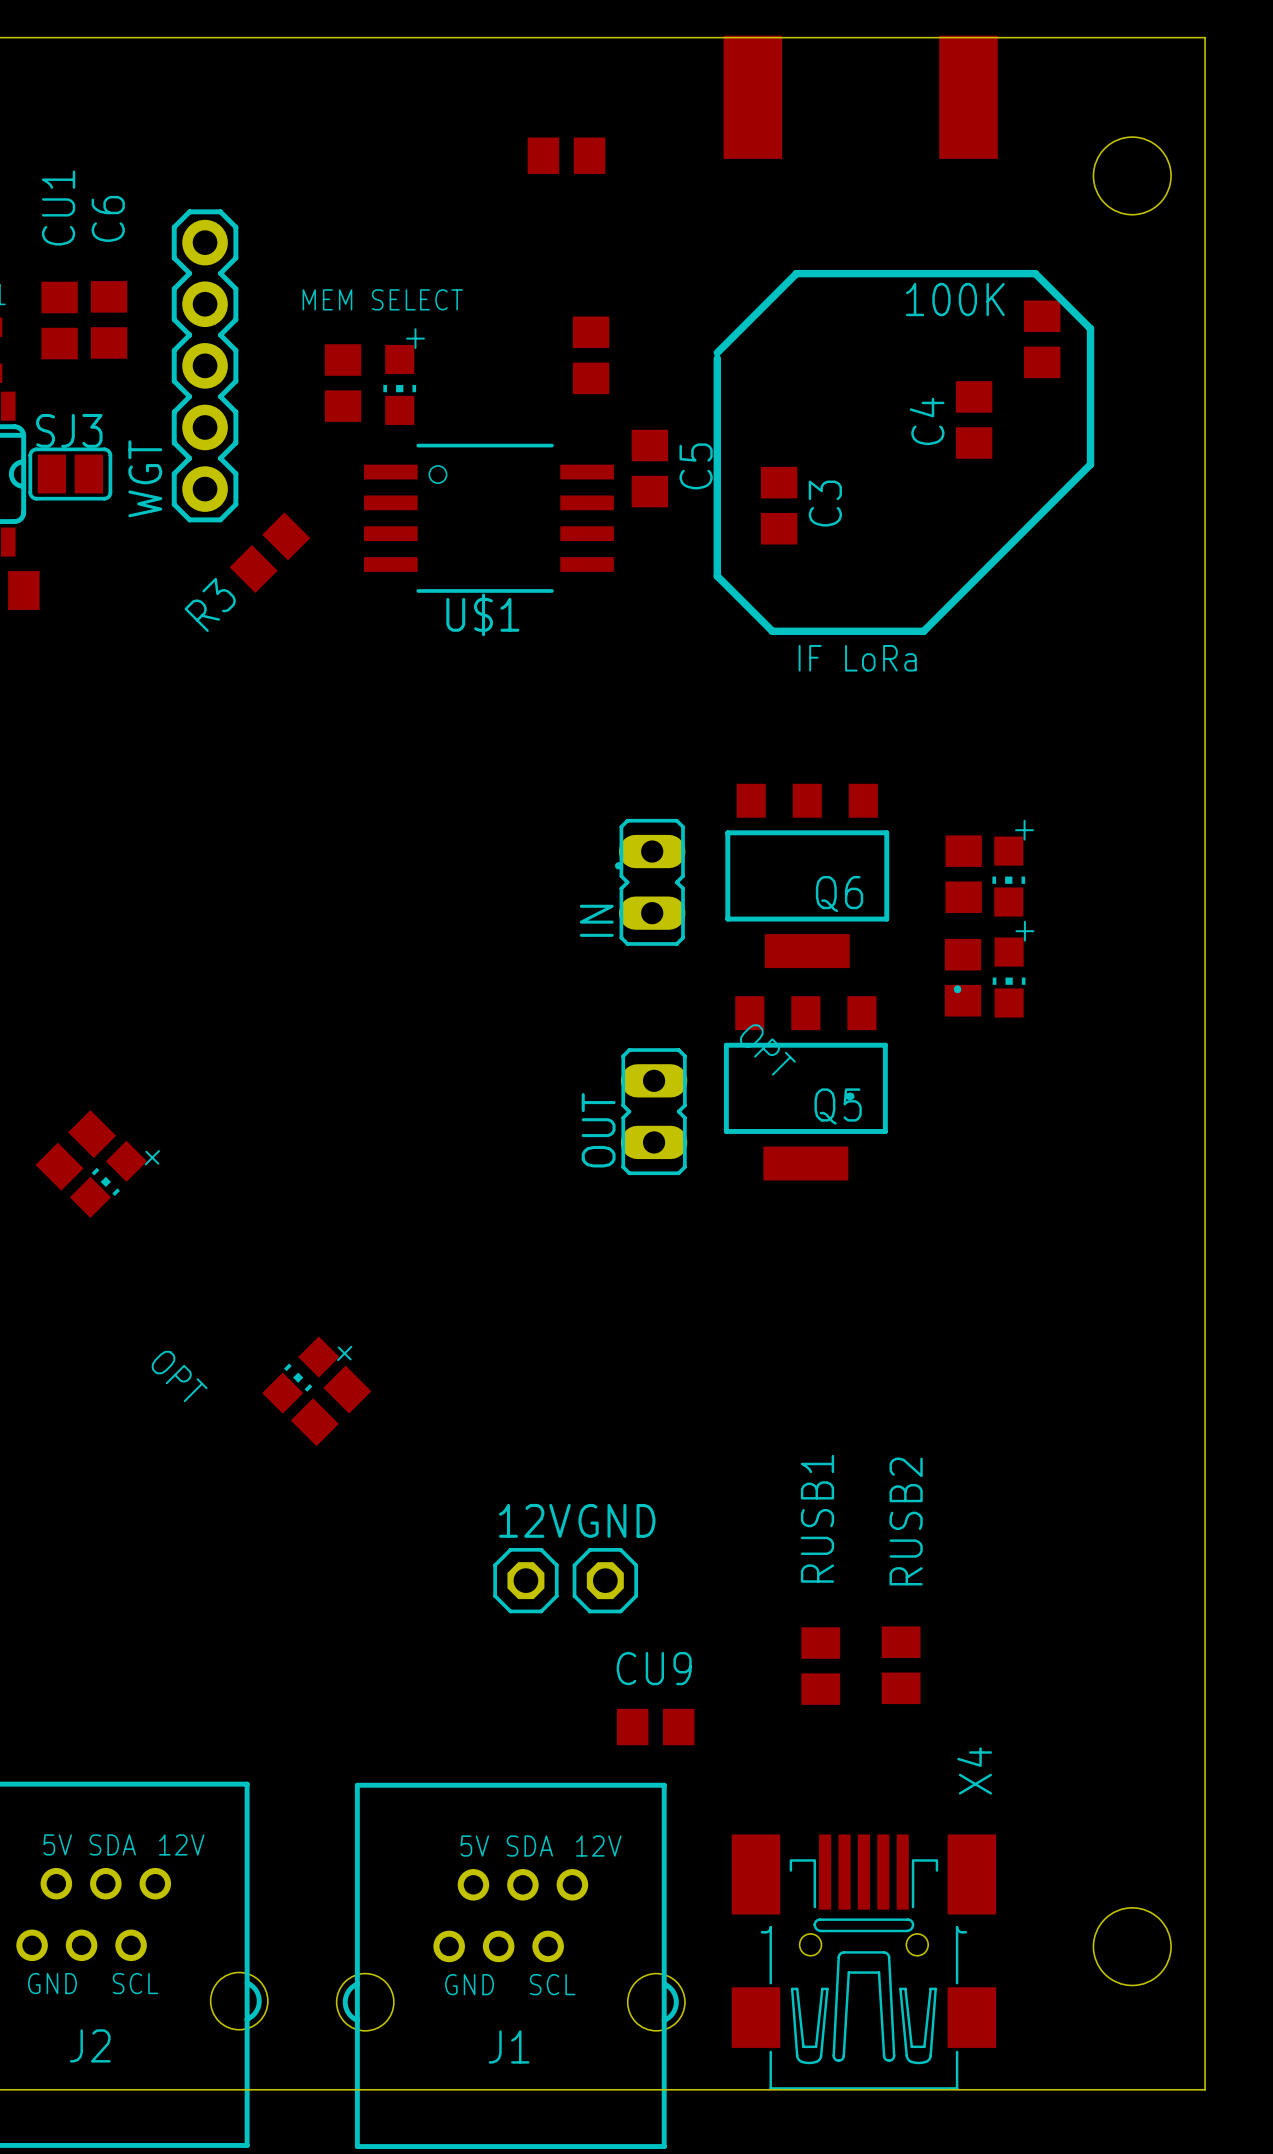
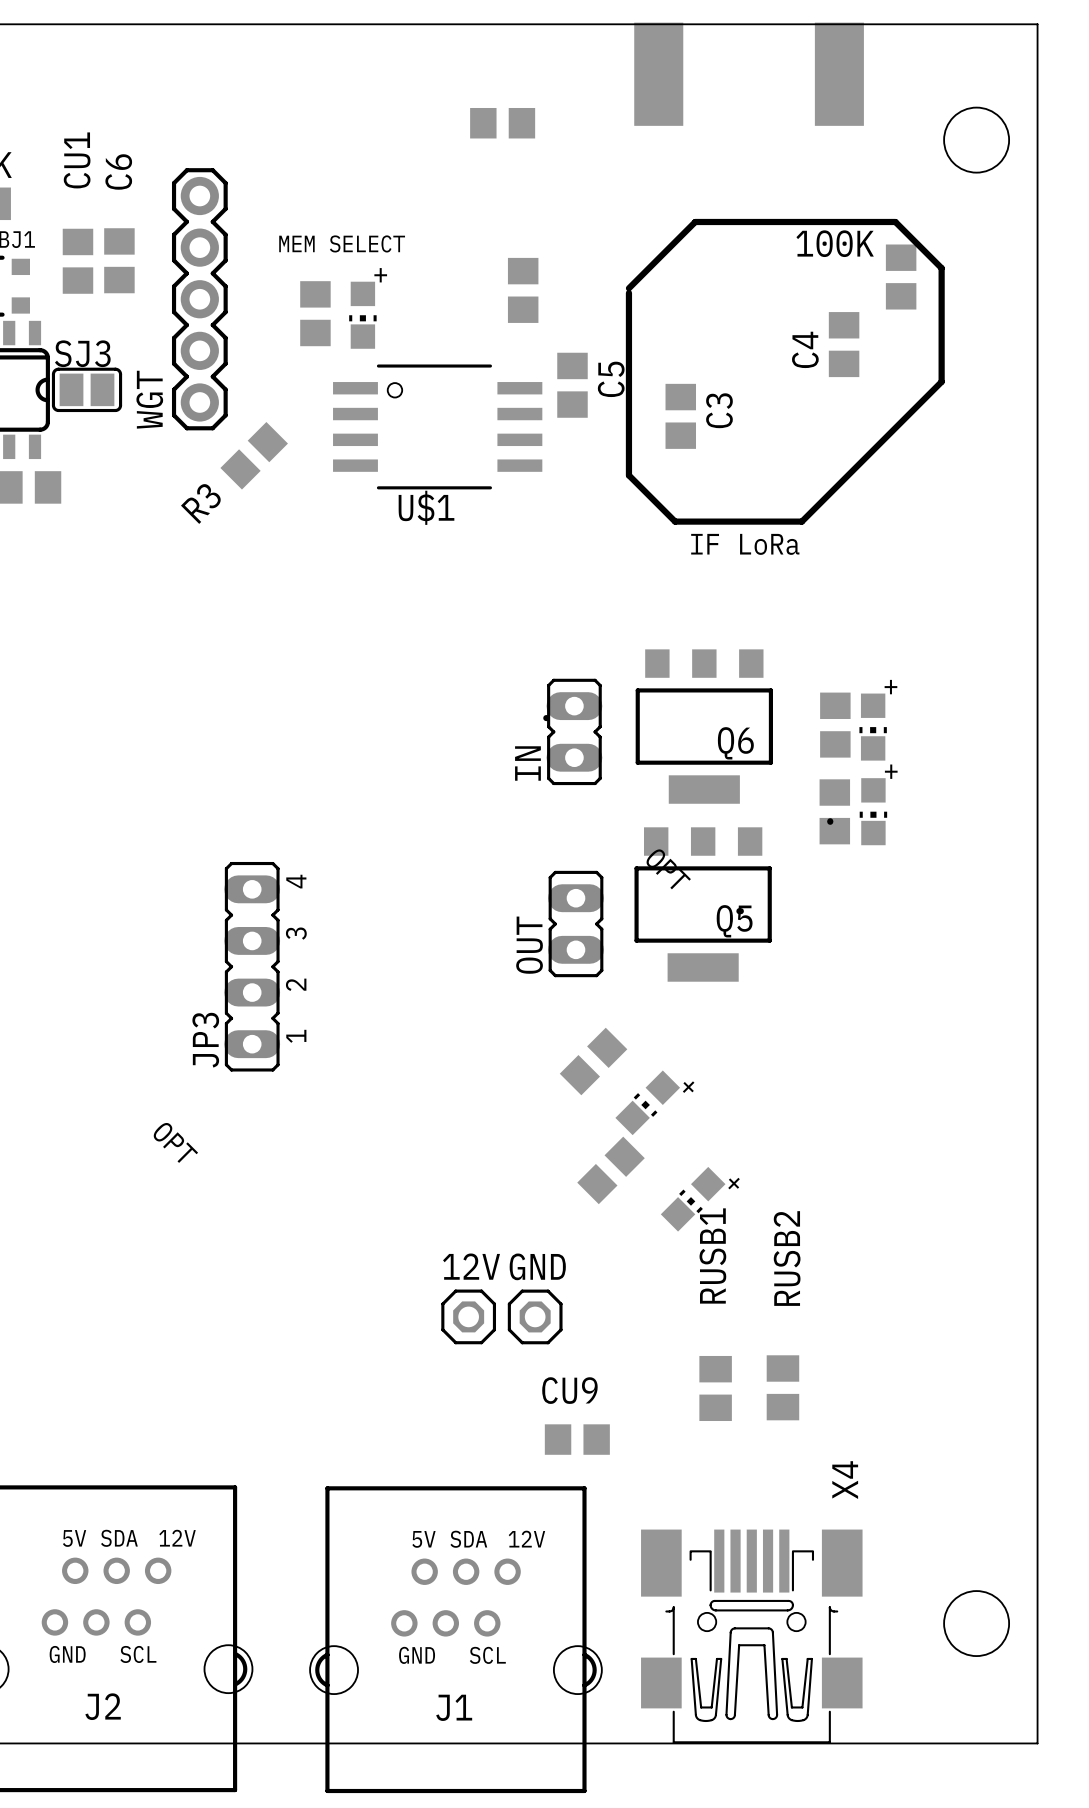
part: (75, 1150) -> none
JP3: none -> (252, 966)
part: (108, 1179) -> none
part: none -> (593, 1061)
part: none -> (647, 1102)
part: (300, 1375) -> none
part: (331, 1405) -> none
part: none -> (611, 1170)
part: none -> (693, 1199)

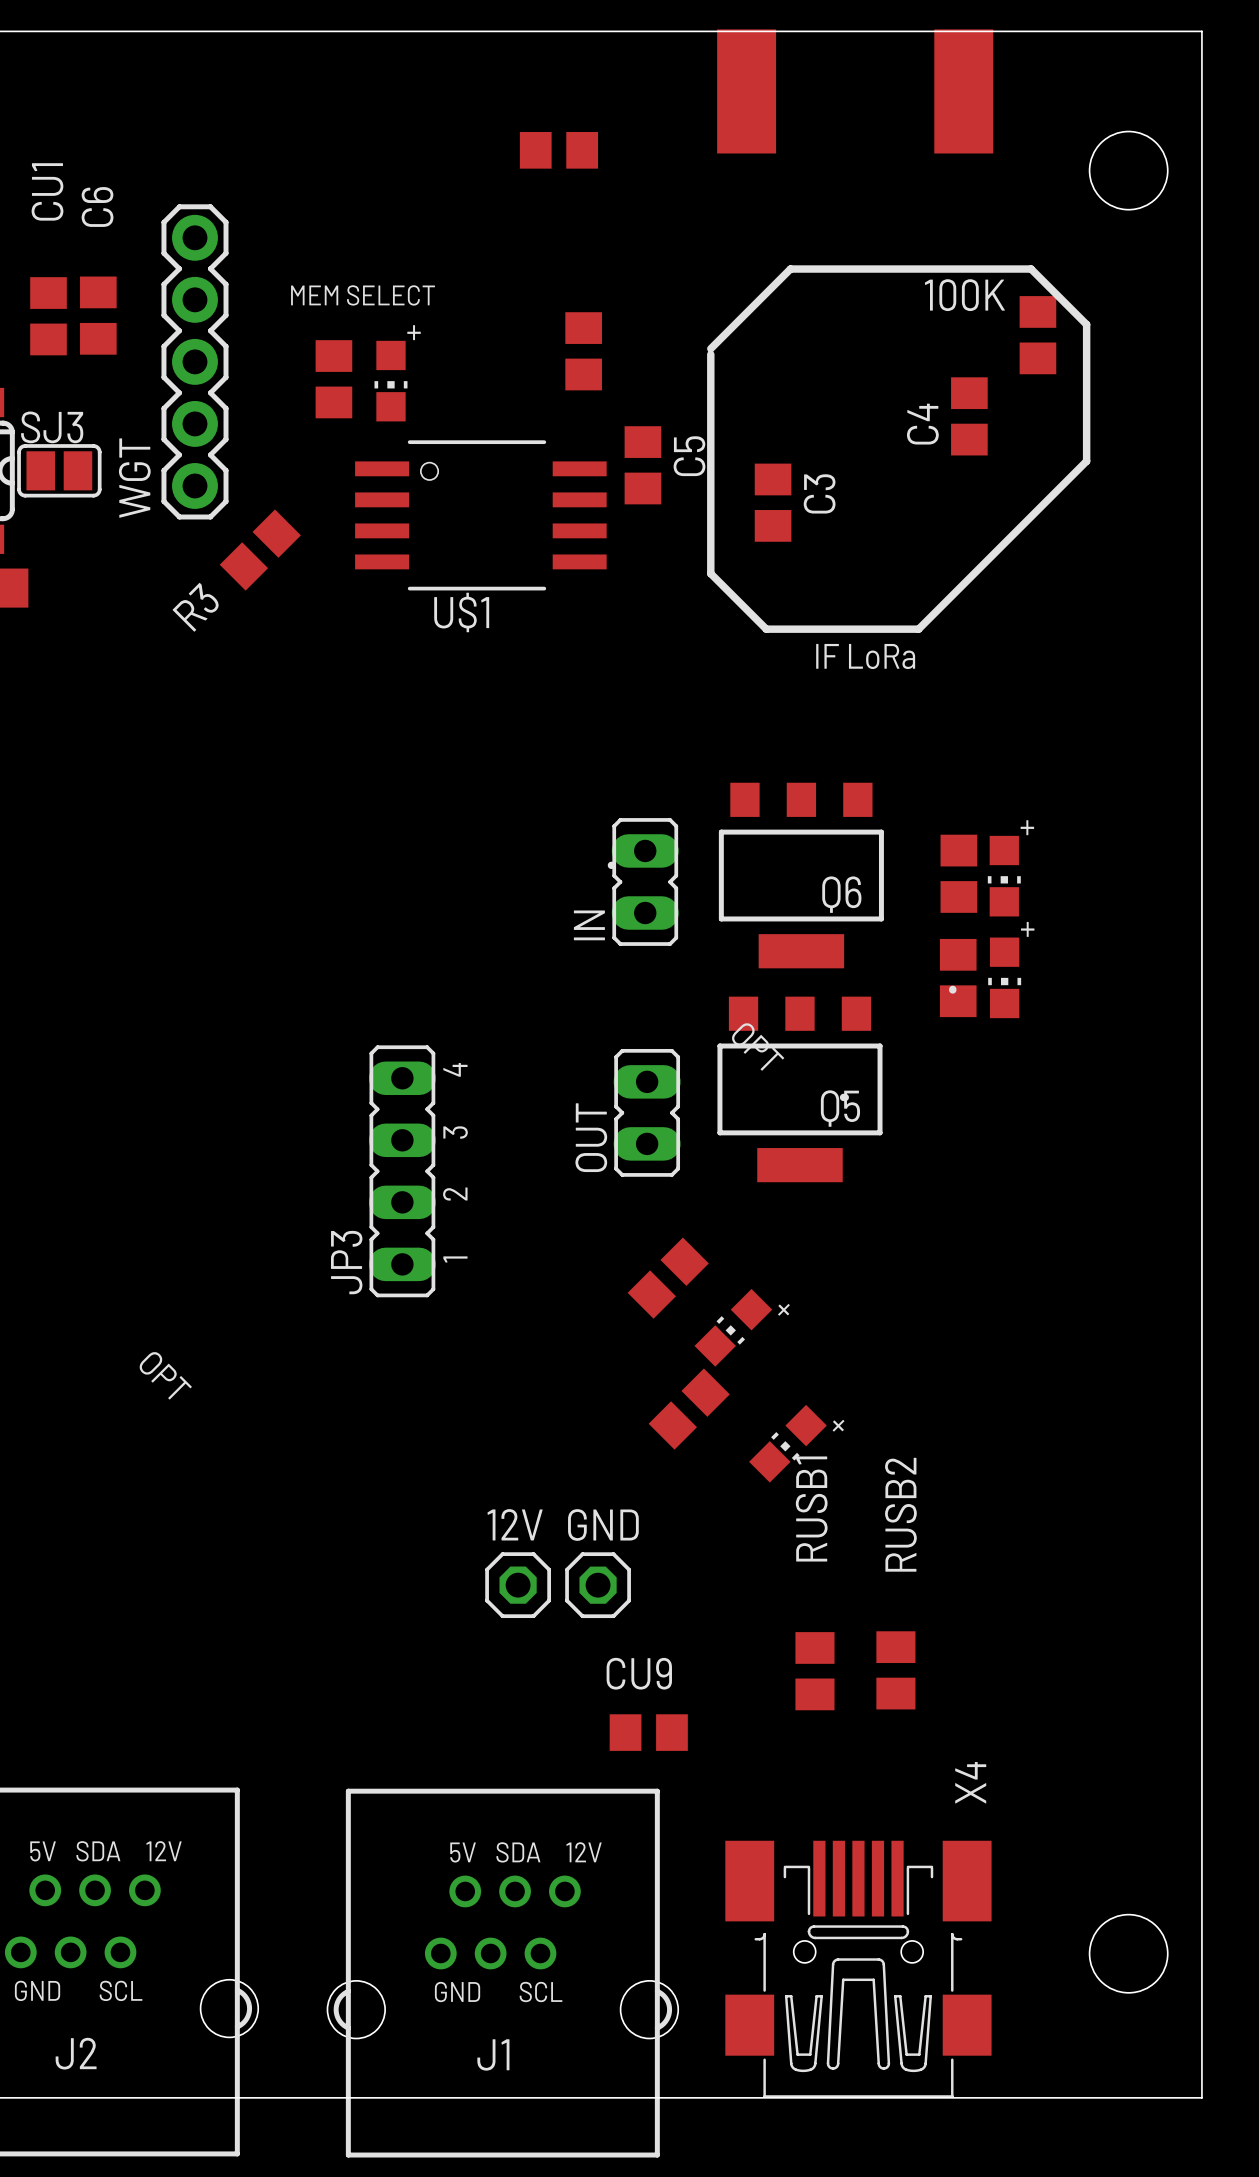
JP3 position: (252, 966) -> (402, 1171)

